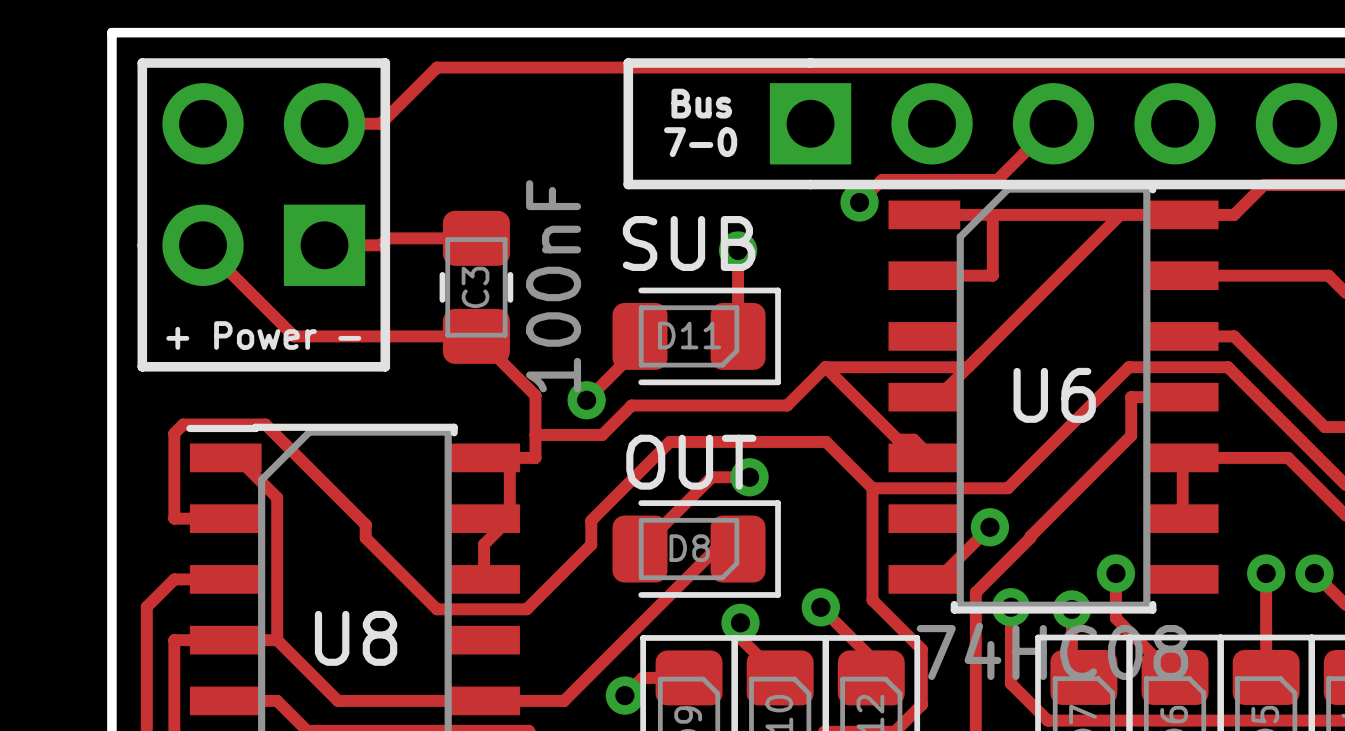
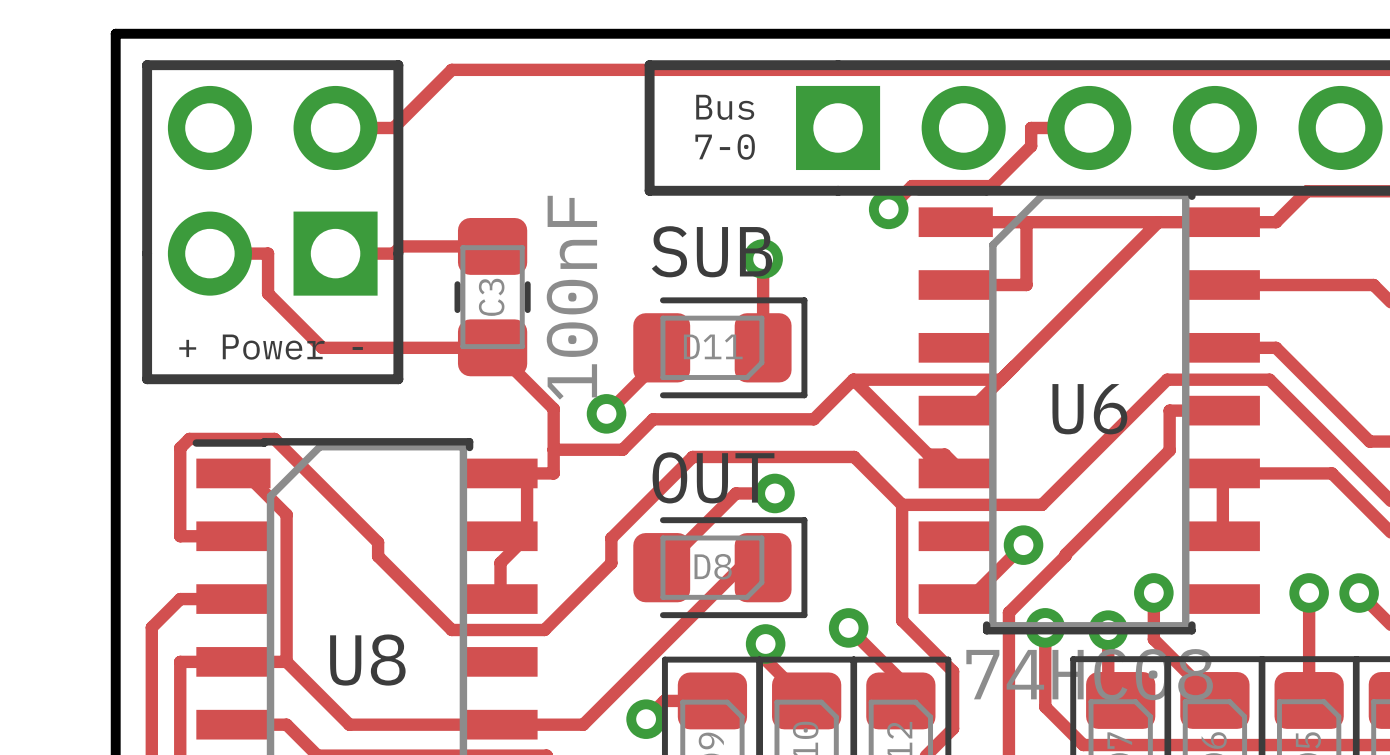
track: (1053, 123) (997, 180) (958, 180) -> (1089, 127) (1031, 127) (1031, 146) (991, 186)
track: (203, 245) (294, 336) (311, 336) -> (209, 253) (268, 253) (268, 293) (322, 347)

